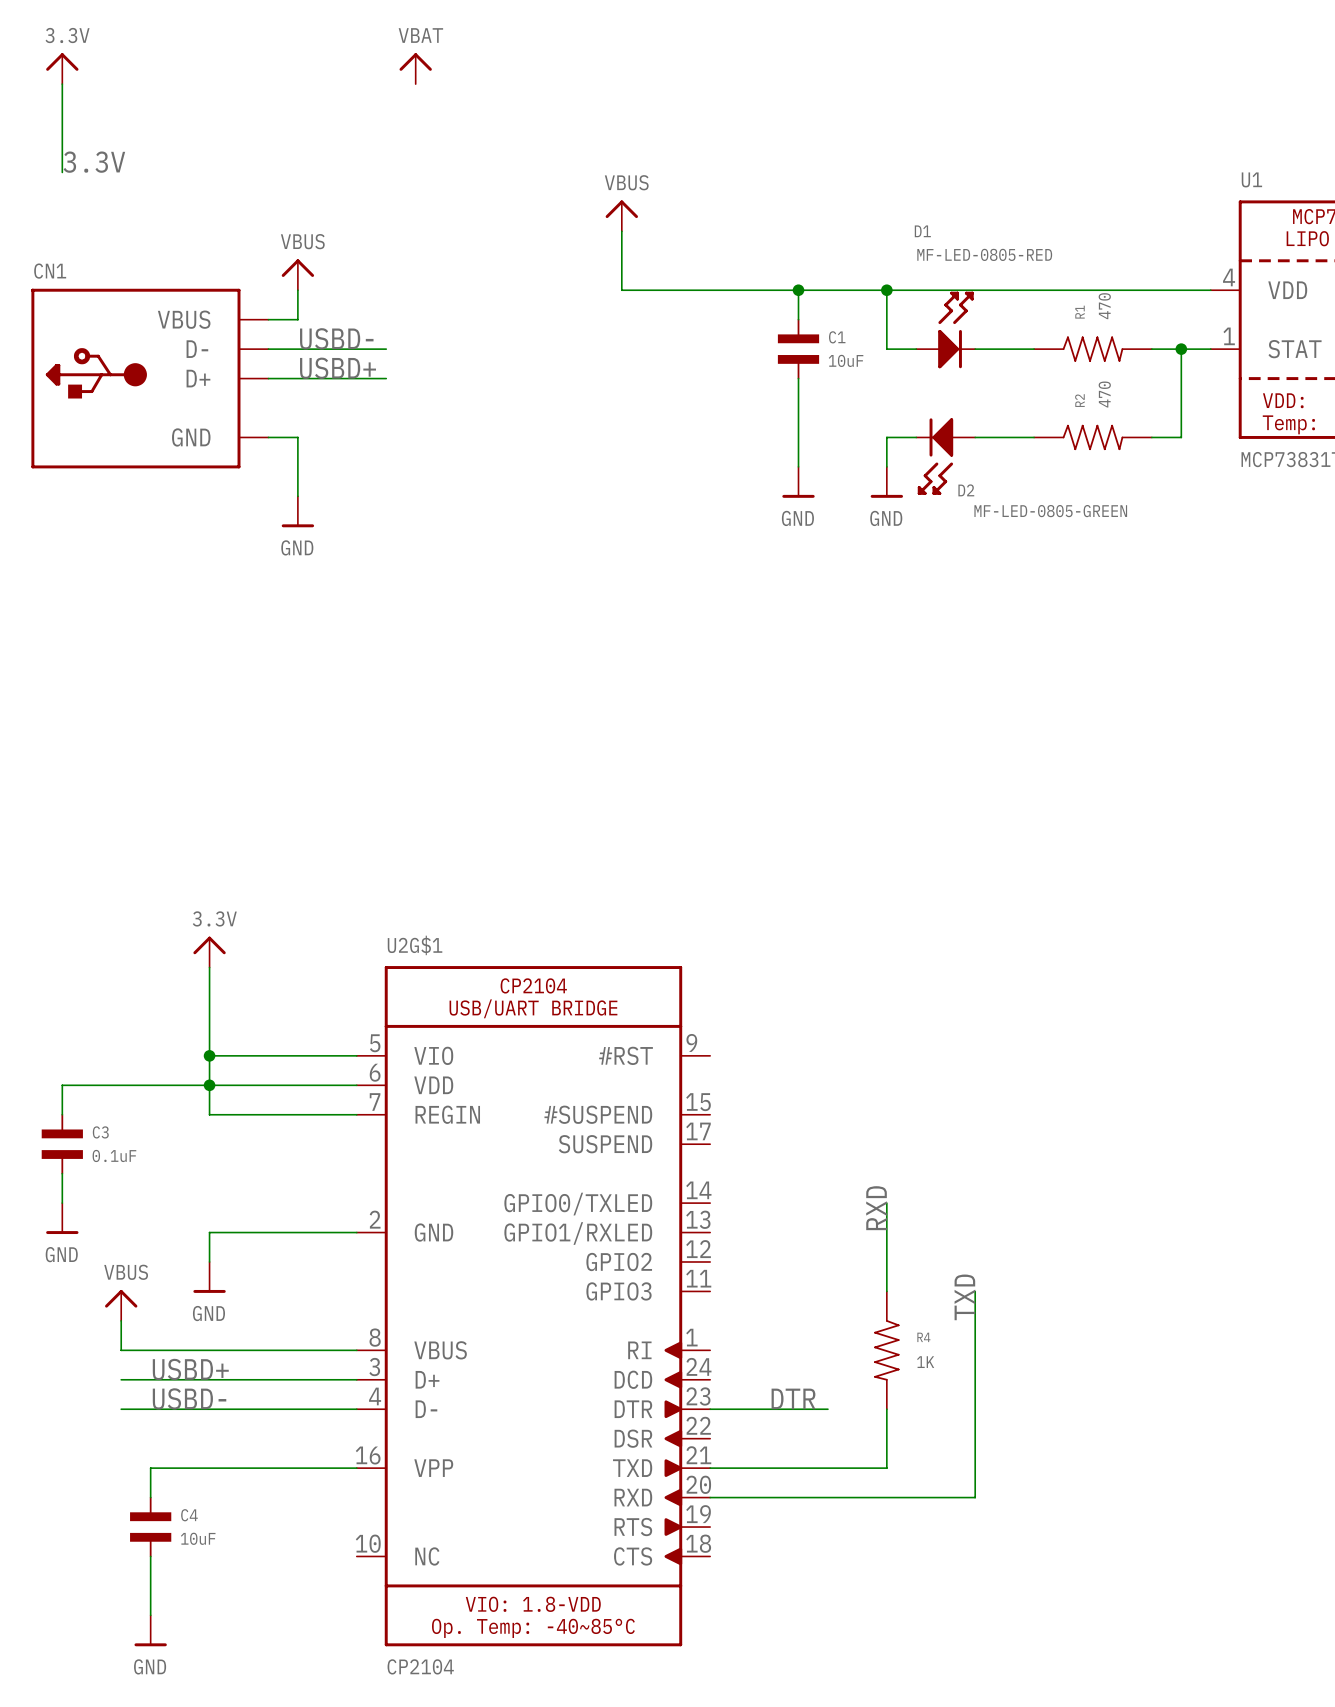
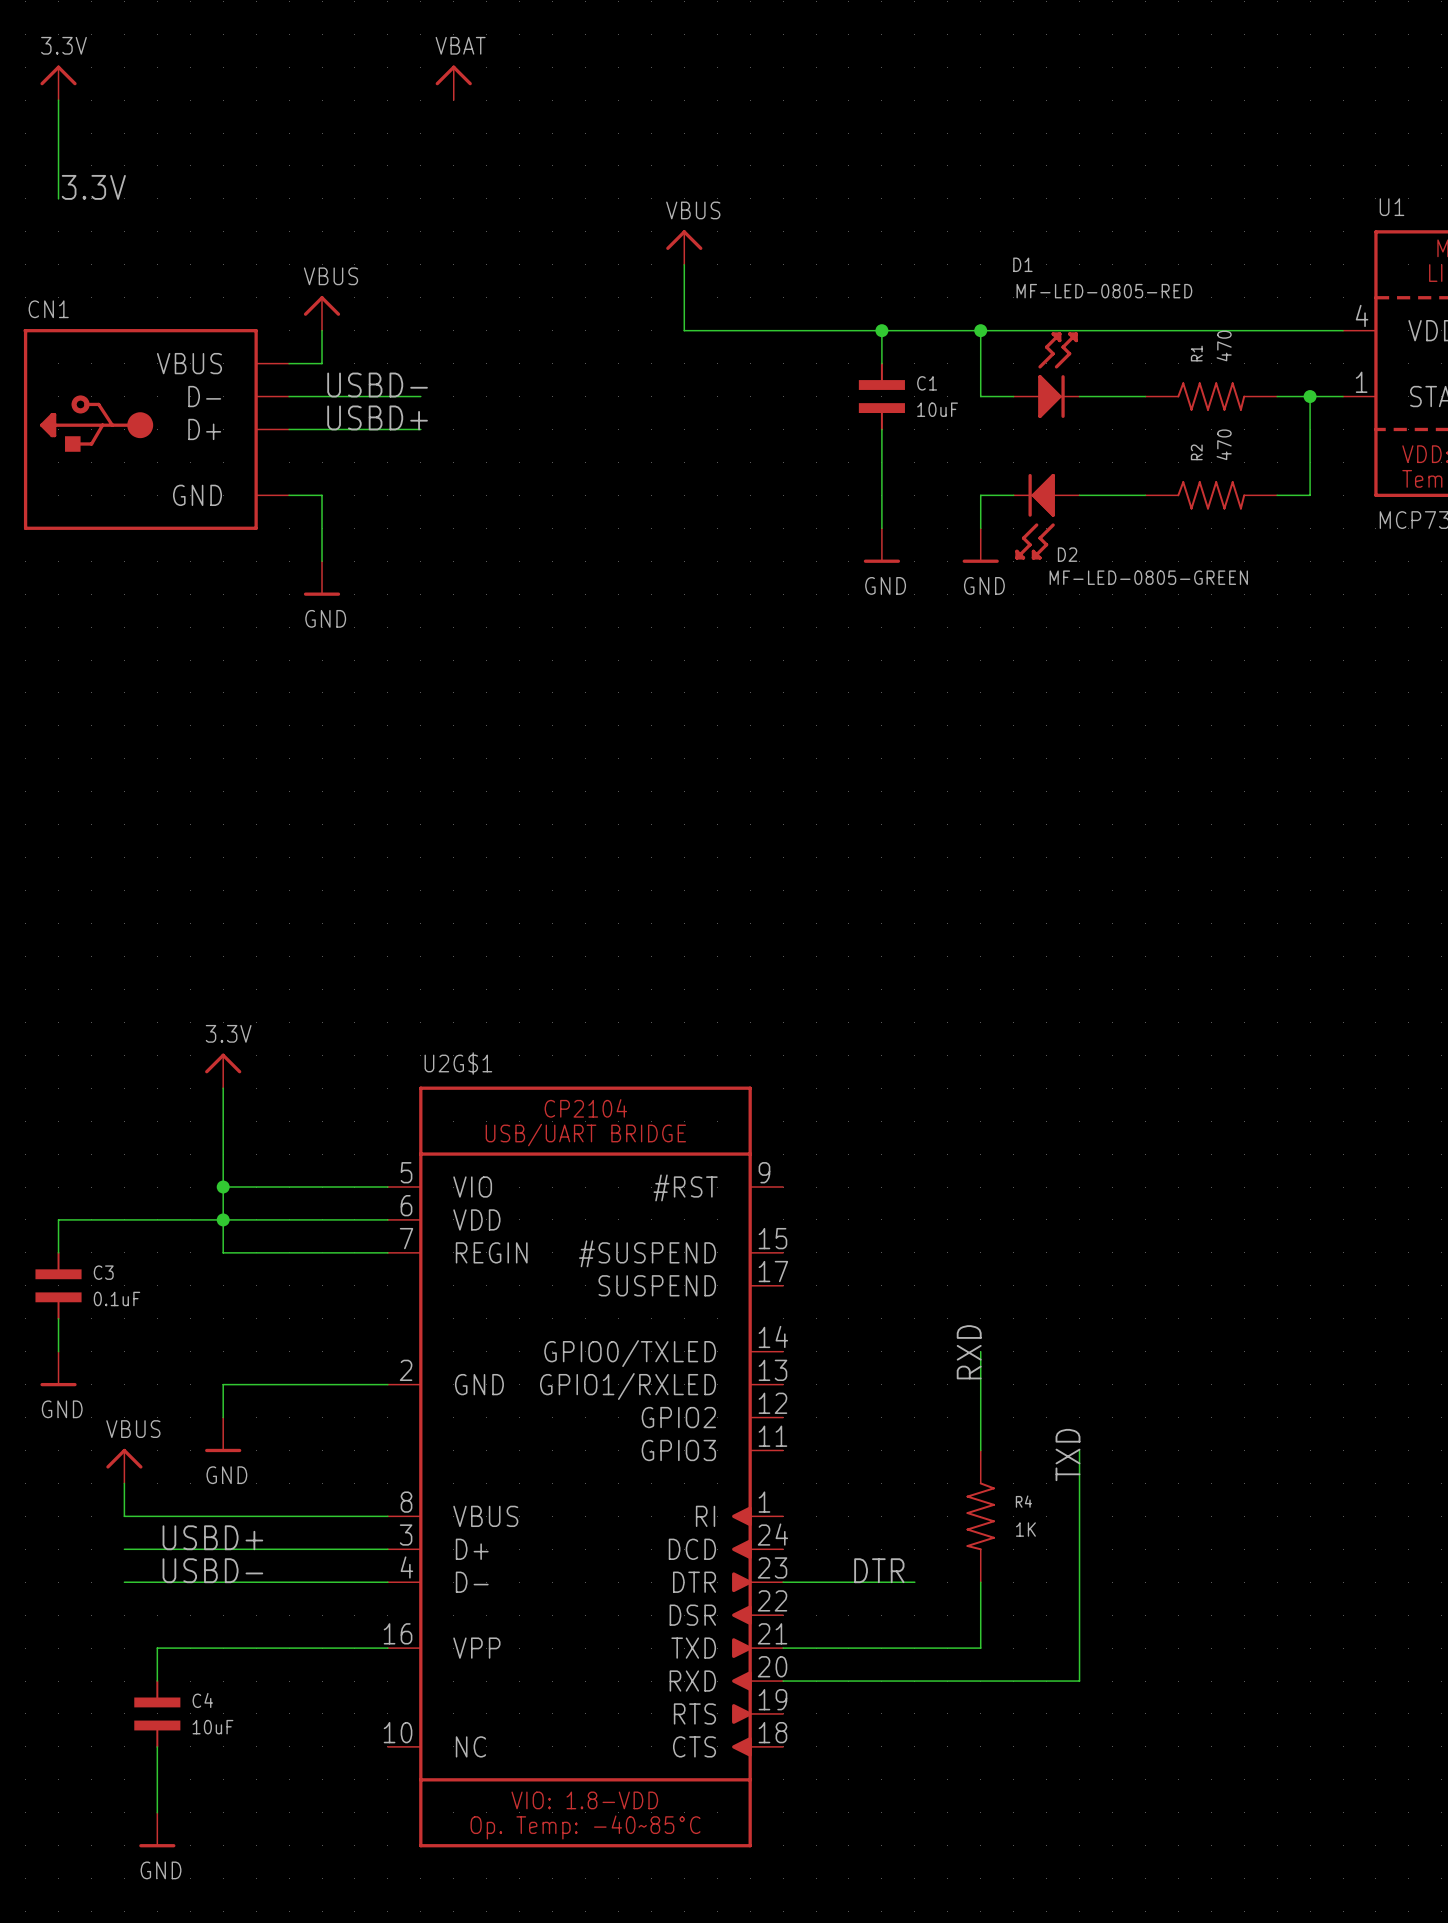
U2G$1 value: CP2104 (420, 1666) -> none

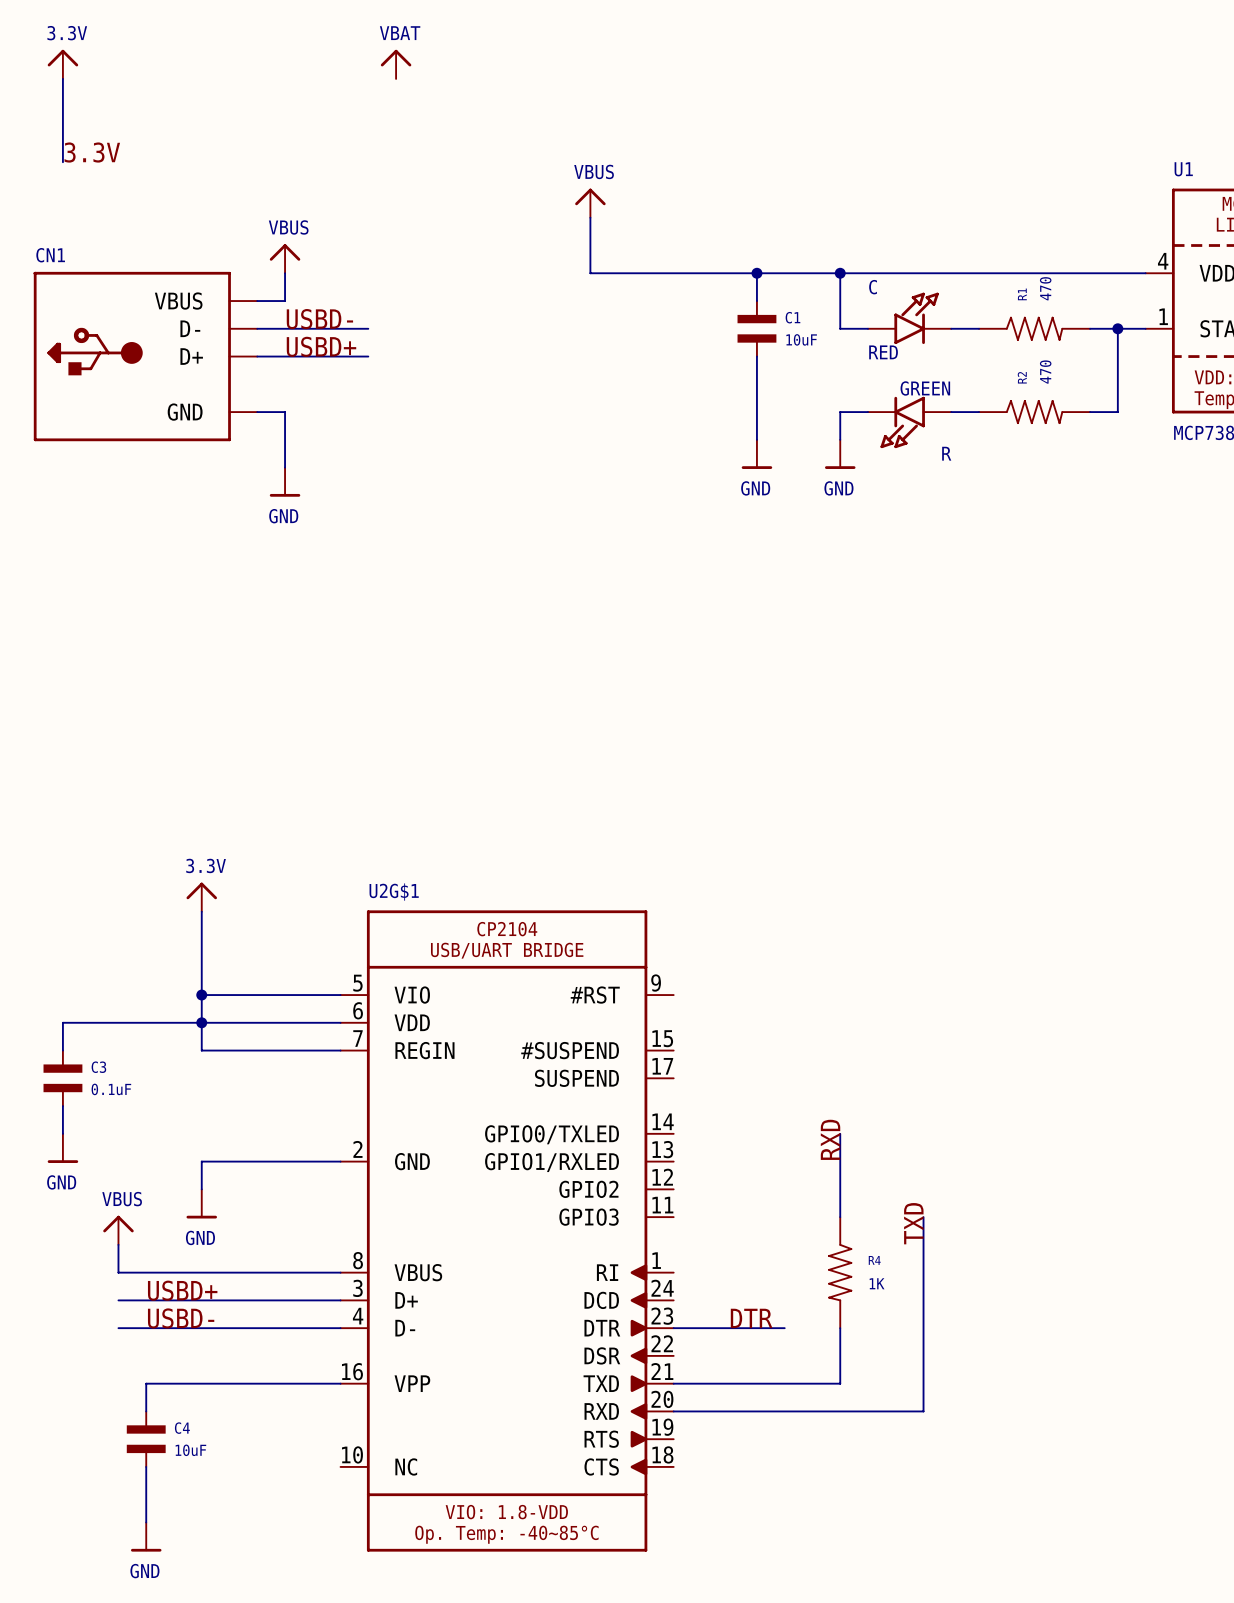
D1: MF-LED-0805-RED (1046, 375) -> none
C: none -> RED (909, 318)
R: none -> GREEN (909, 422)
D2: MF-LED-0805-GREEN (1046, 516) -> none

